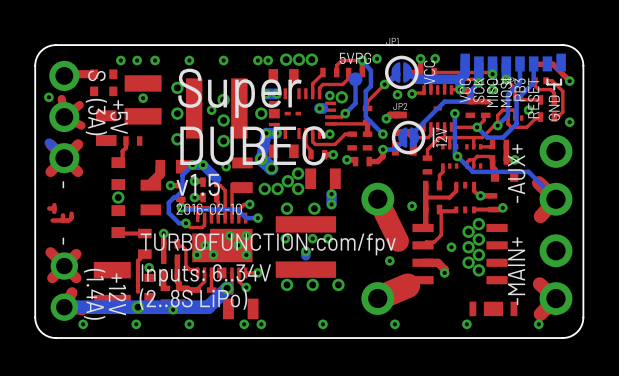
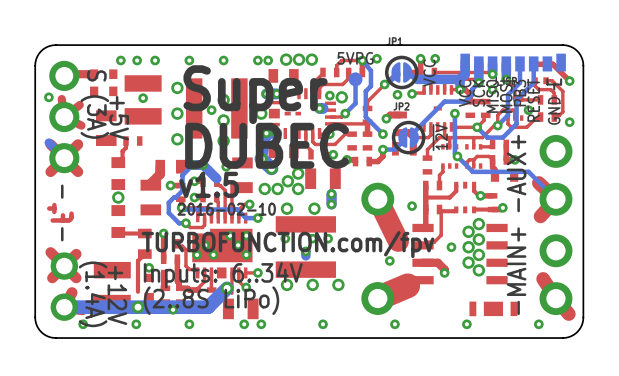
top track: none -> (543, 278) (568, 314)
top track: (539, 284) (555, 298) (540, 314) -> none

